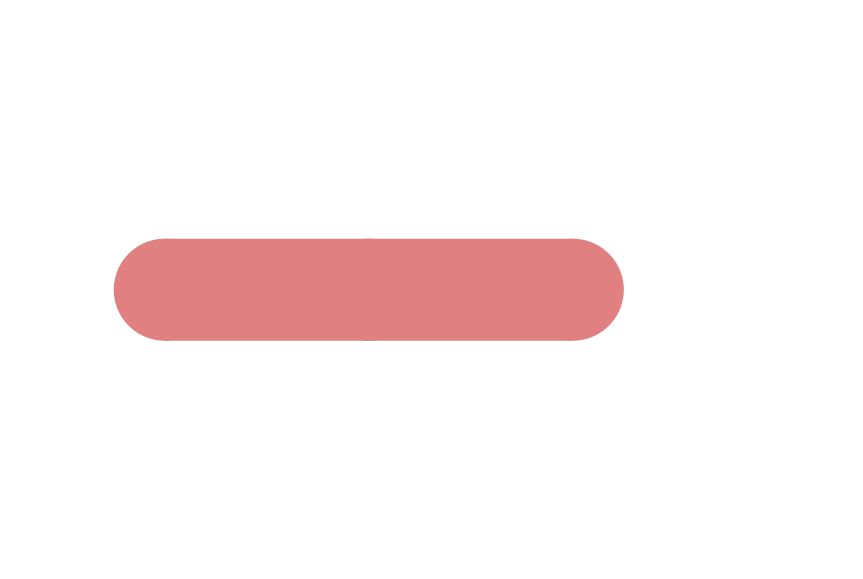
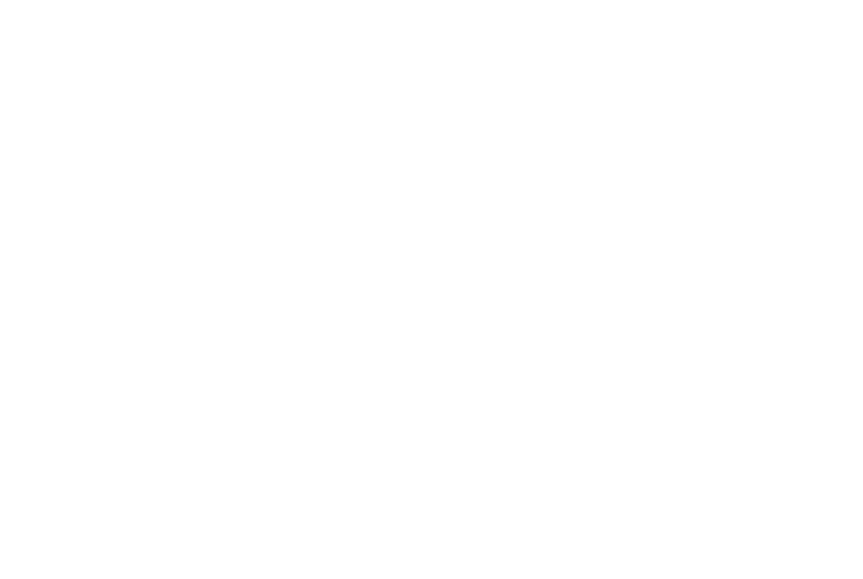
part: (368, 289) -> none

